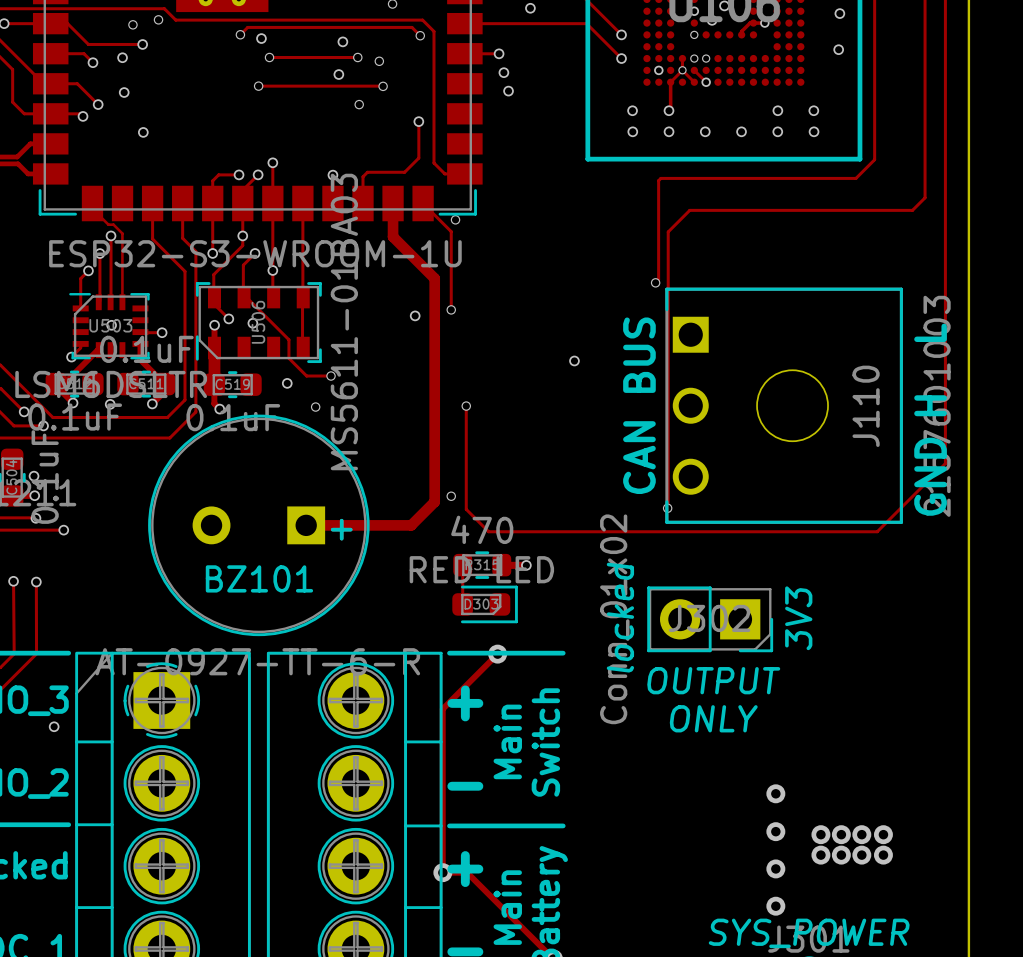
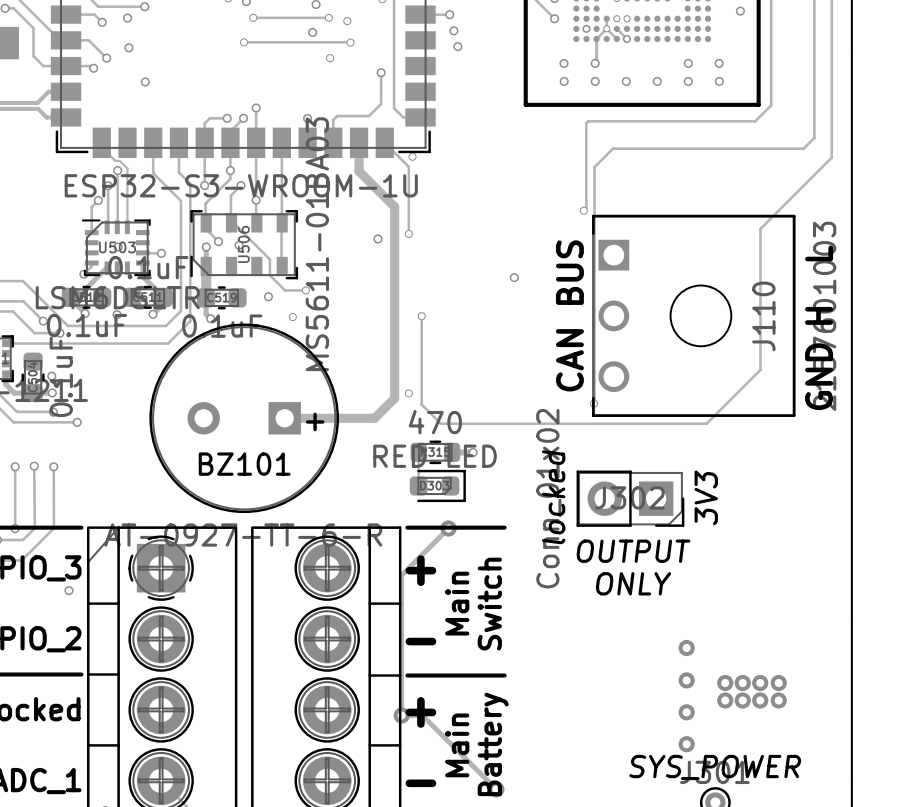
track: (945, 220) (945, 463) (877, 531) (799, 531) -> (831, 157) (760, 228) (760, 369) (706, 423)

